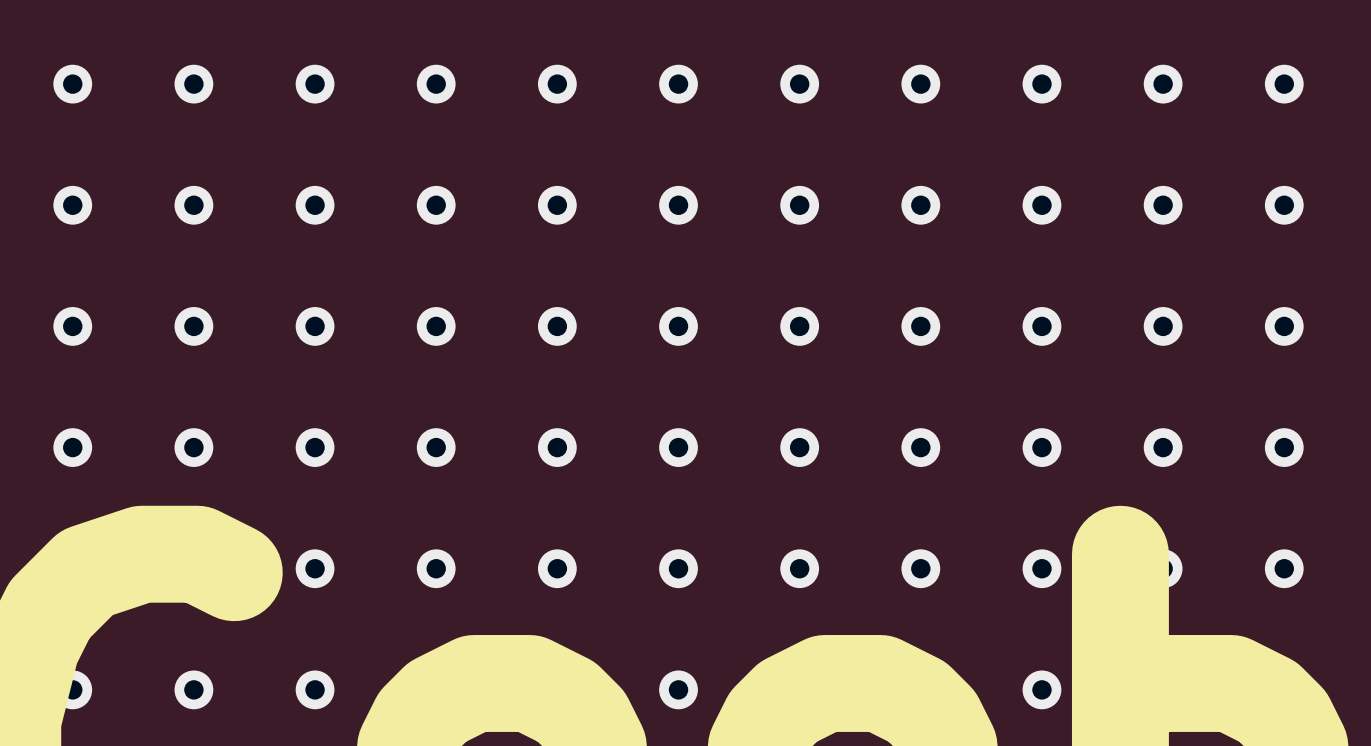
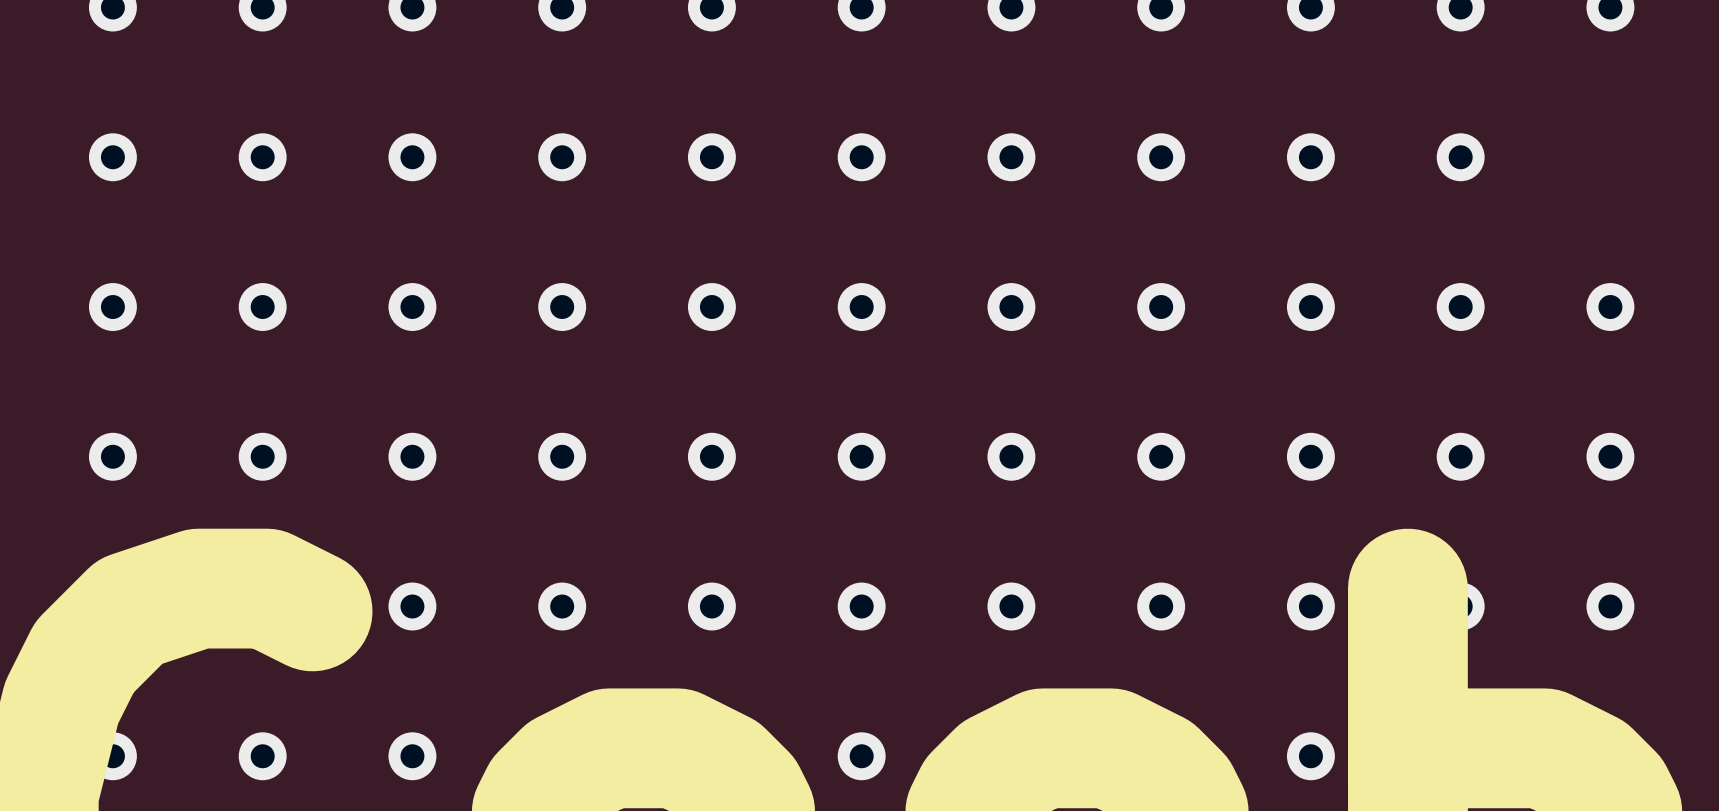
via: (1284, 205) -> none

